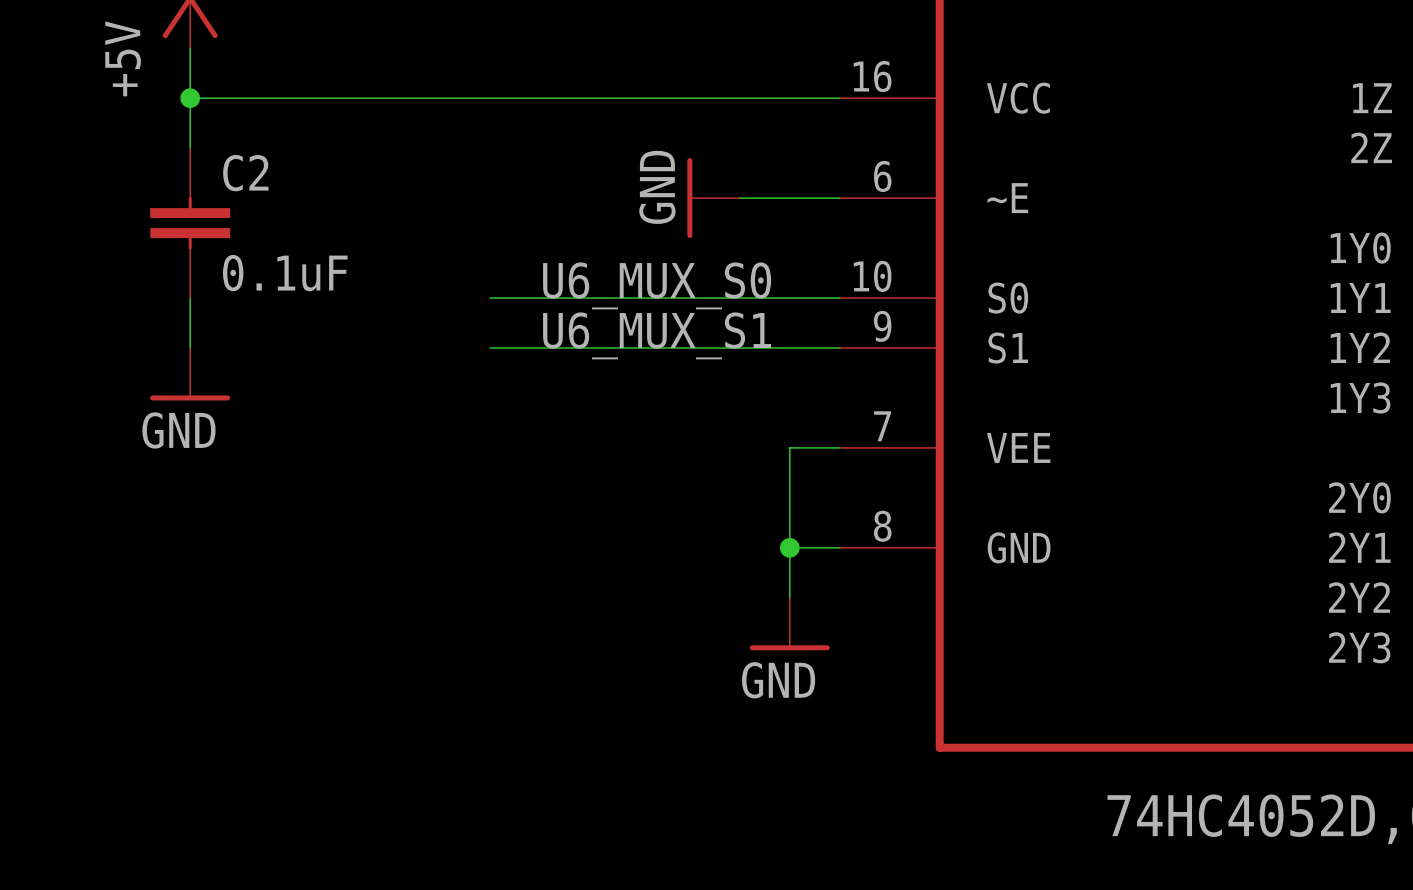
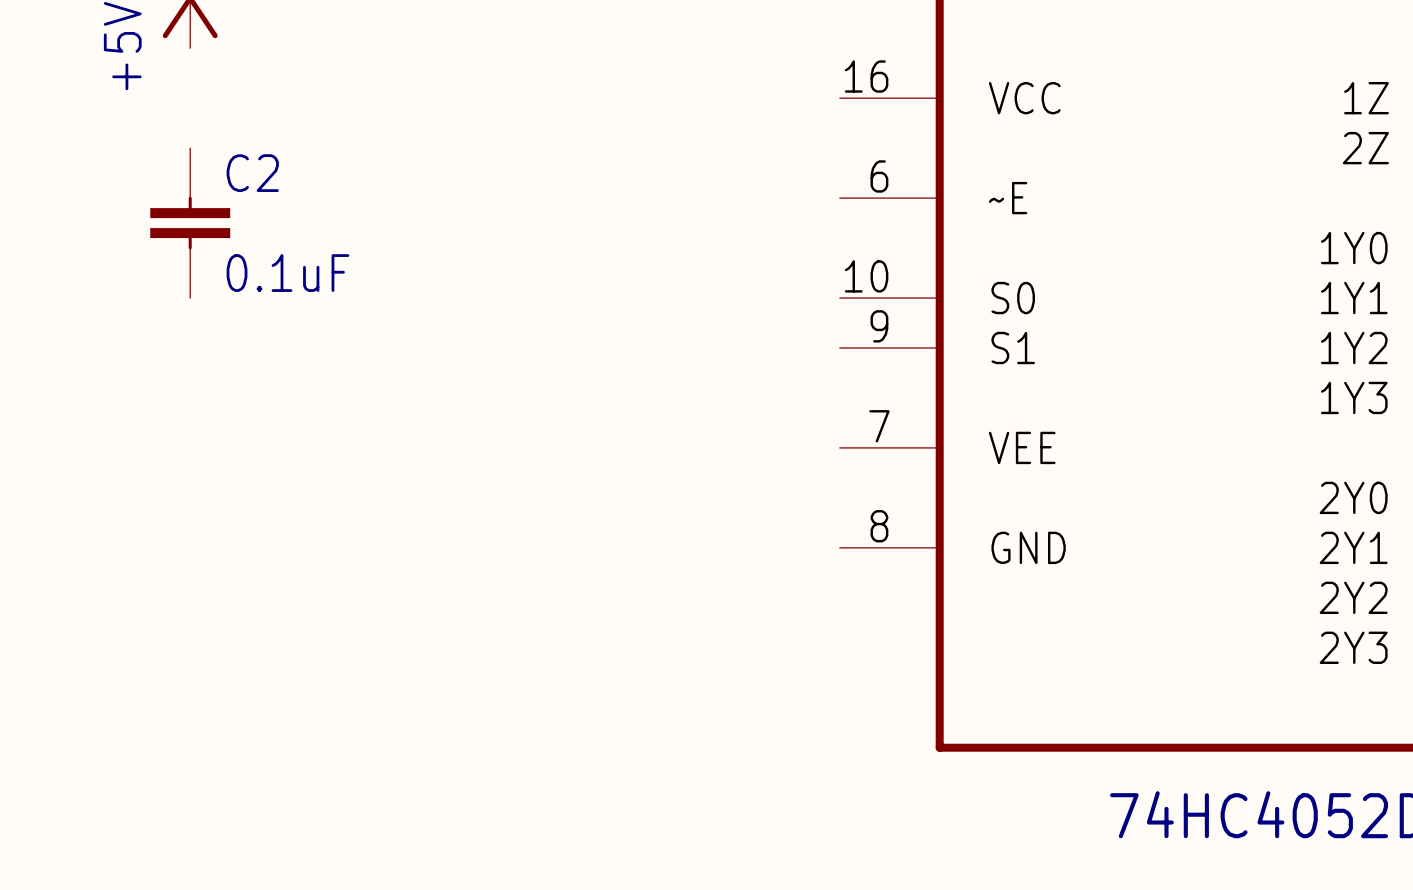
wire: (190, 48) (190, 148) -> none
wire: (190, 98) (839, 98) -> none
junction: (190, 98) -> none
power symbol: GND (713, 198) -> none
wire: (739, 198) (839, 198) -> none
label: U6_MUX_S0 (657, 285) -> none
wire: (190, 298) (190, 348) -> none
wire: (490, 298) (839, 298) -> none
label: U6_MUX_S1 (657, 335) -> none
wire: (490, 348) (839, 348) -> none
power symbol: GND (190, 374) -> none
wire: (839, 447) (789, 447) (789, 597) -> none
wire: (789, 547) (839, 547) -> none
junction: (789, 547) -> none
power symbol: GND (789, 624) -> none

